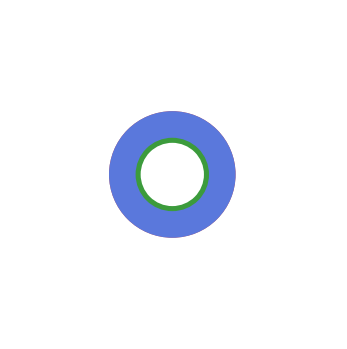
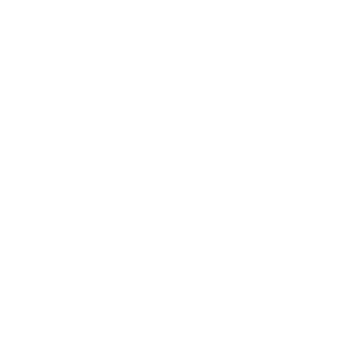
part: (172, 174) -> none

